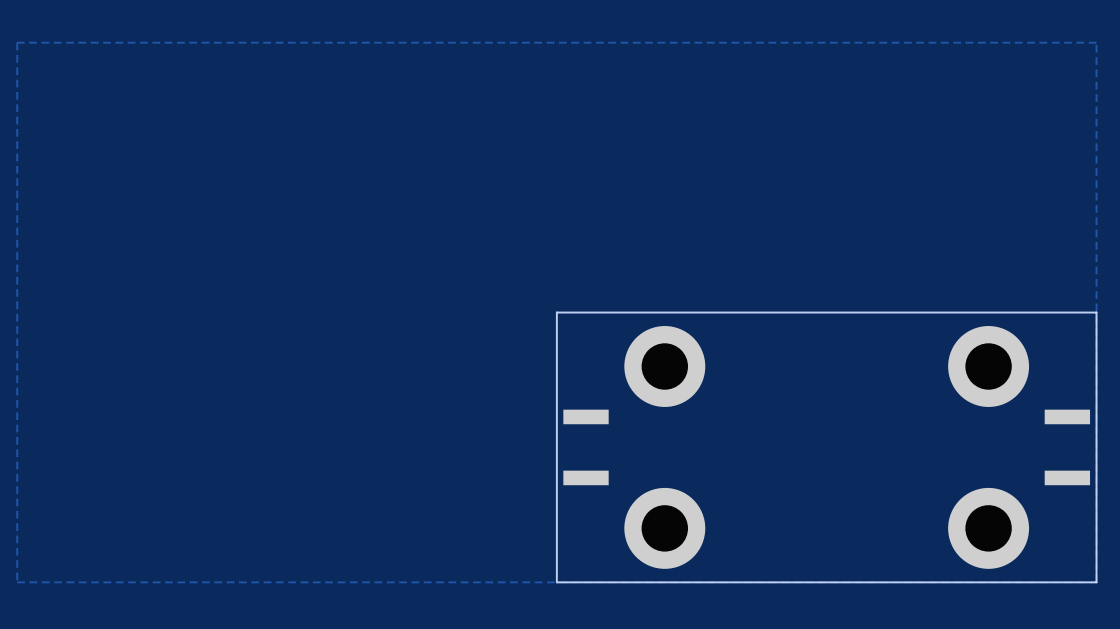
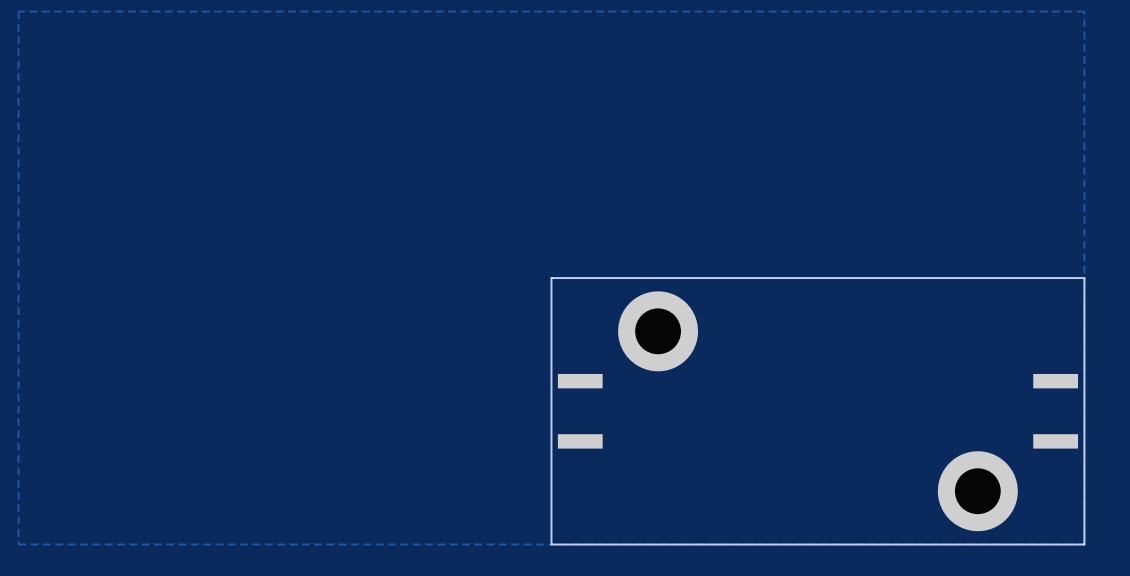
part: (988, 366) -> none
part: (664, 528) -> none

